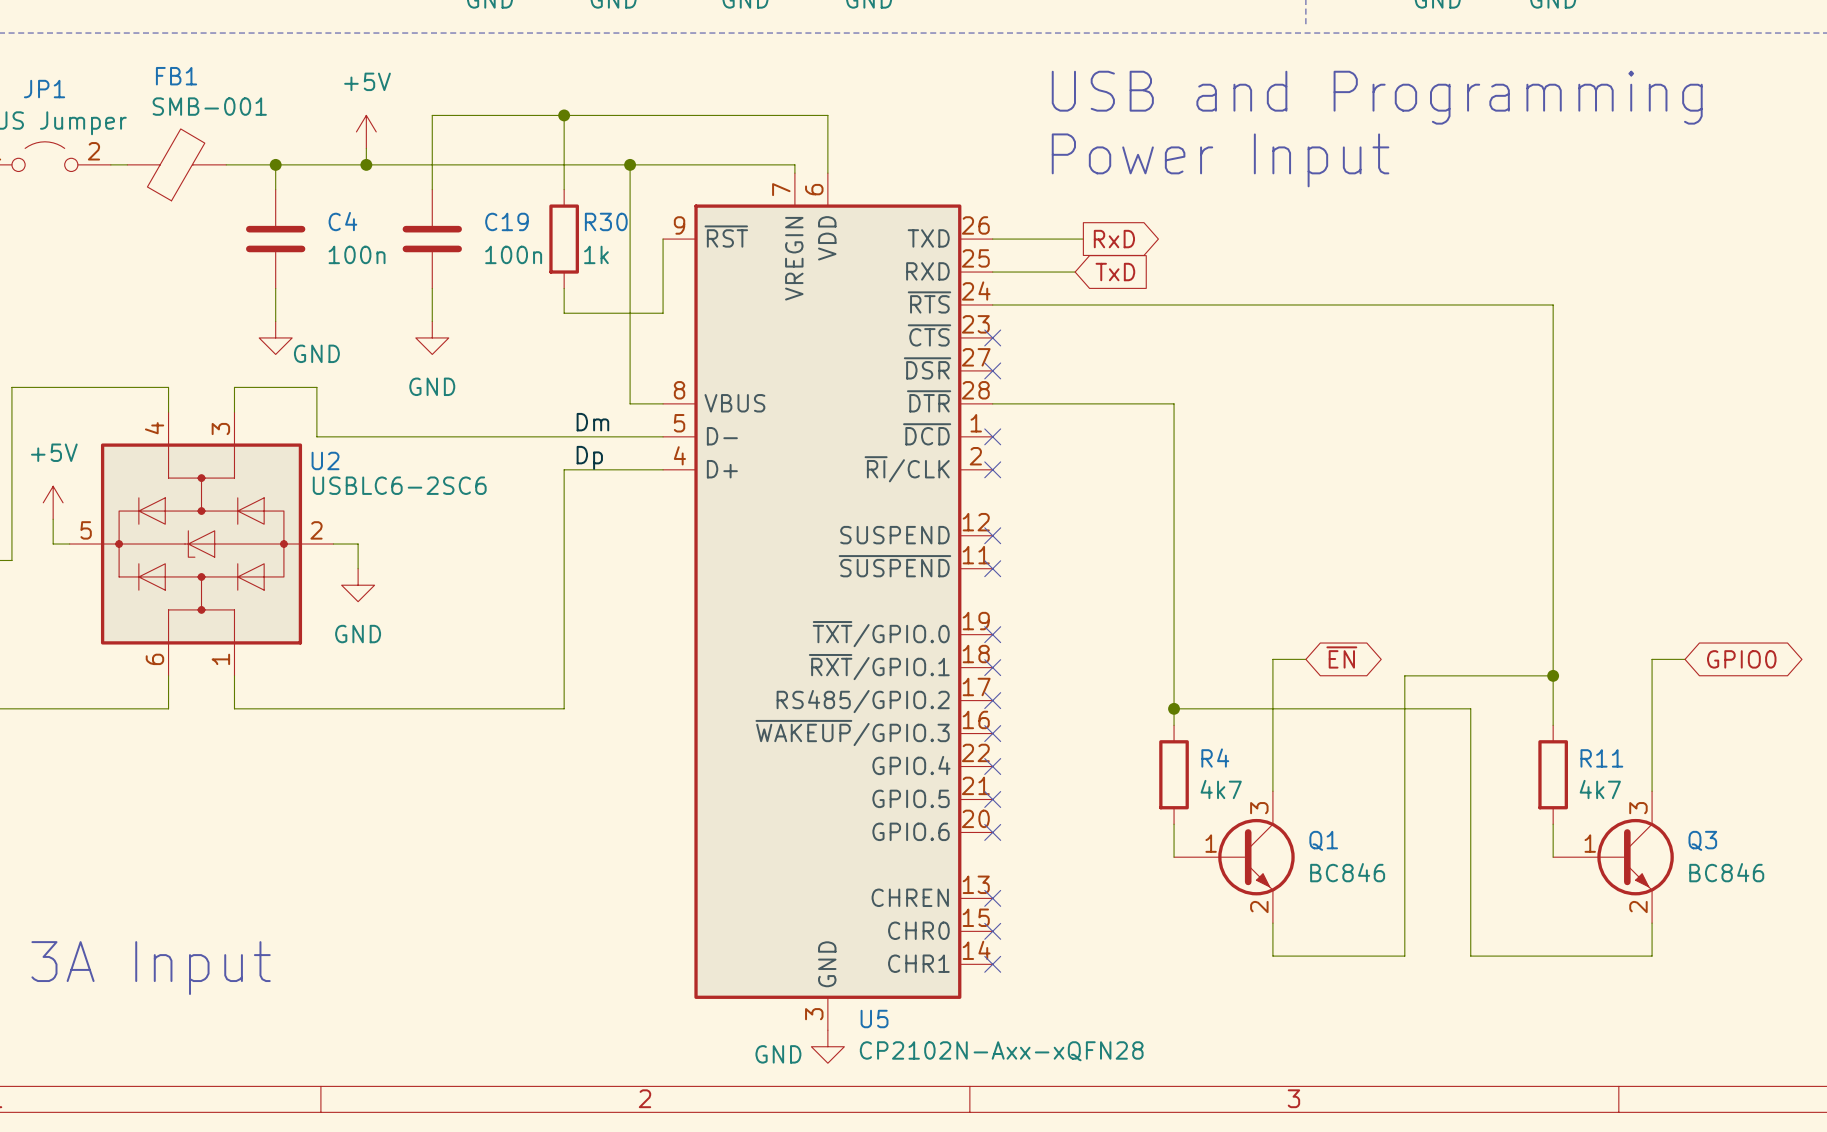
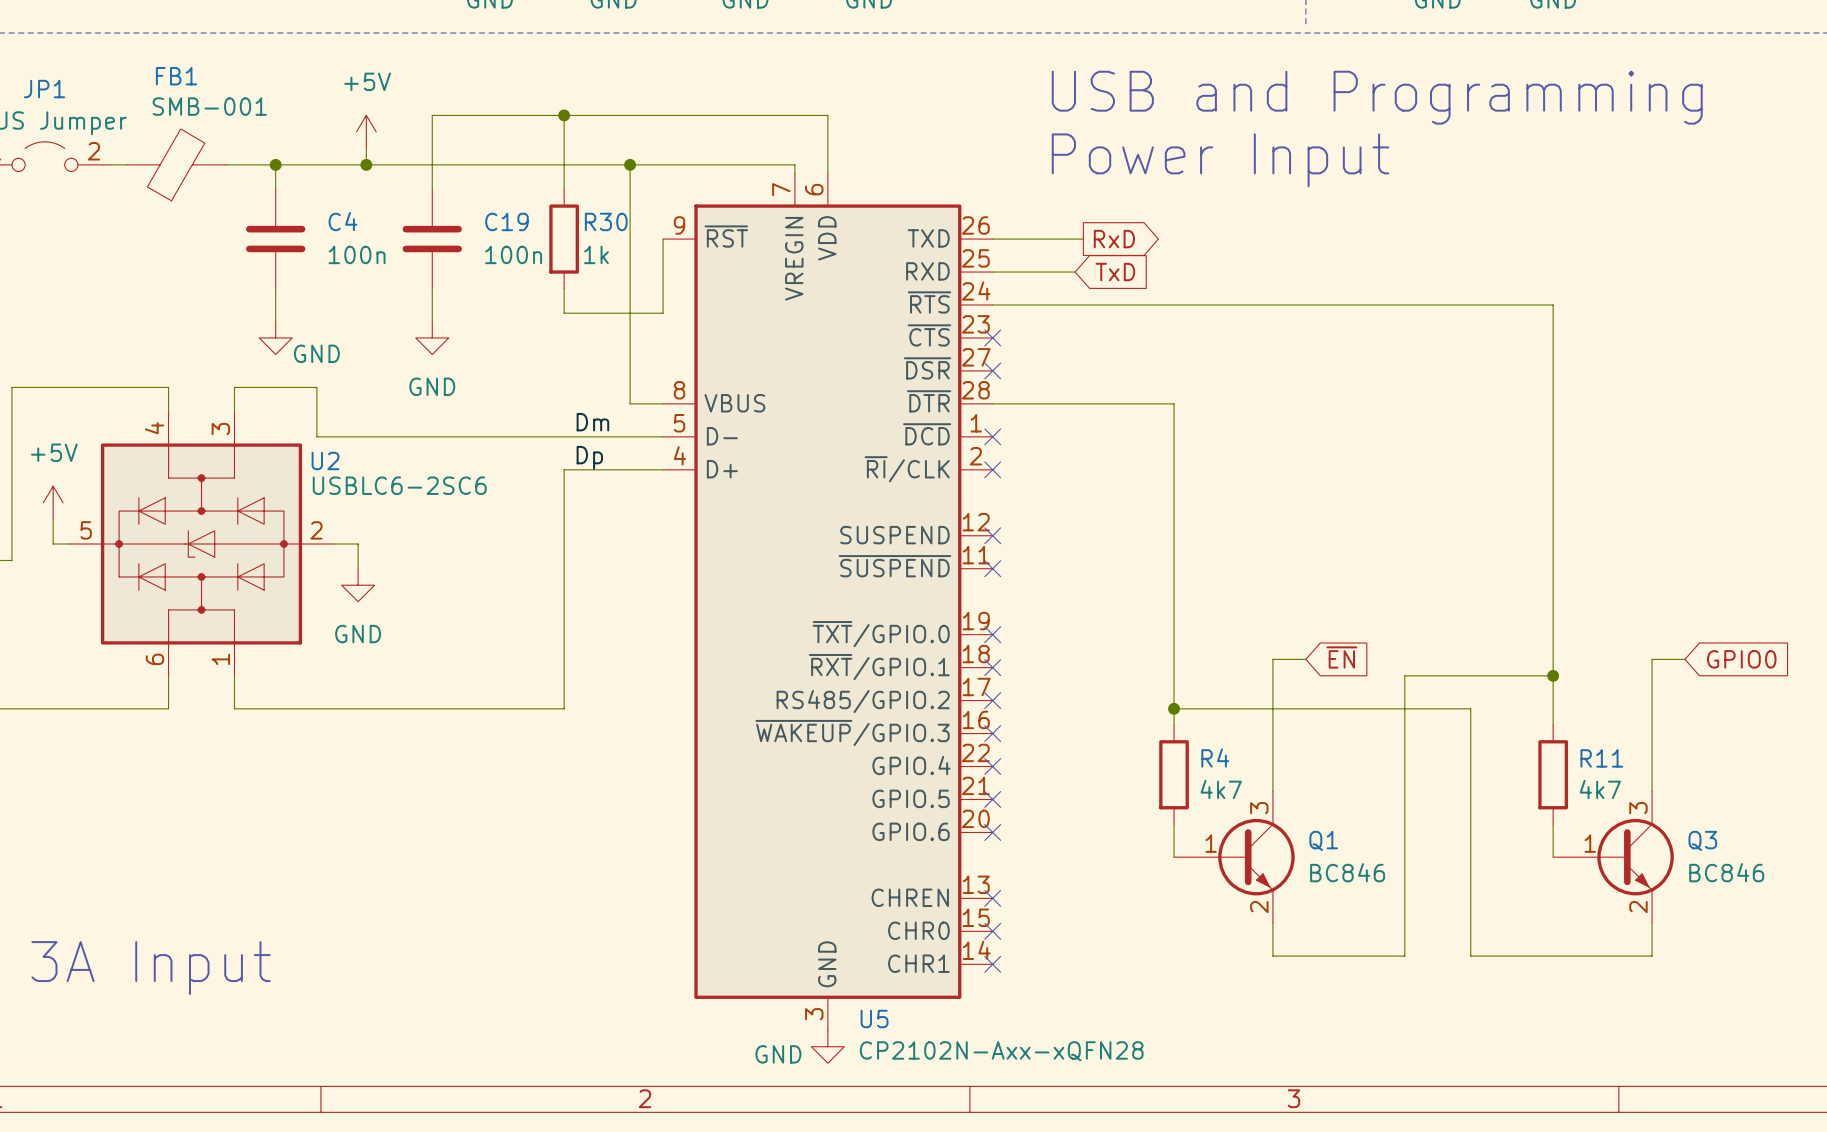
global label shape: bidirectional (1341, 657) -> input (1341, 657)
global label shape: bidirectional (1741, 659) -> input (1741, 659)

